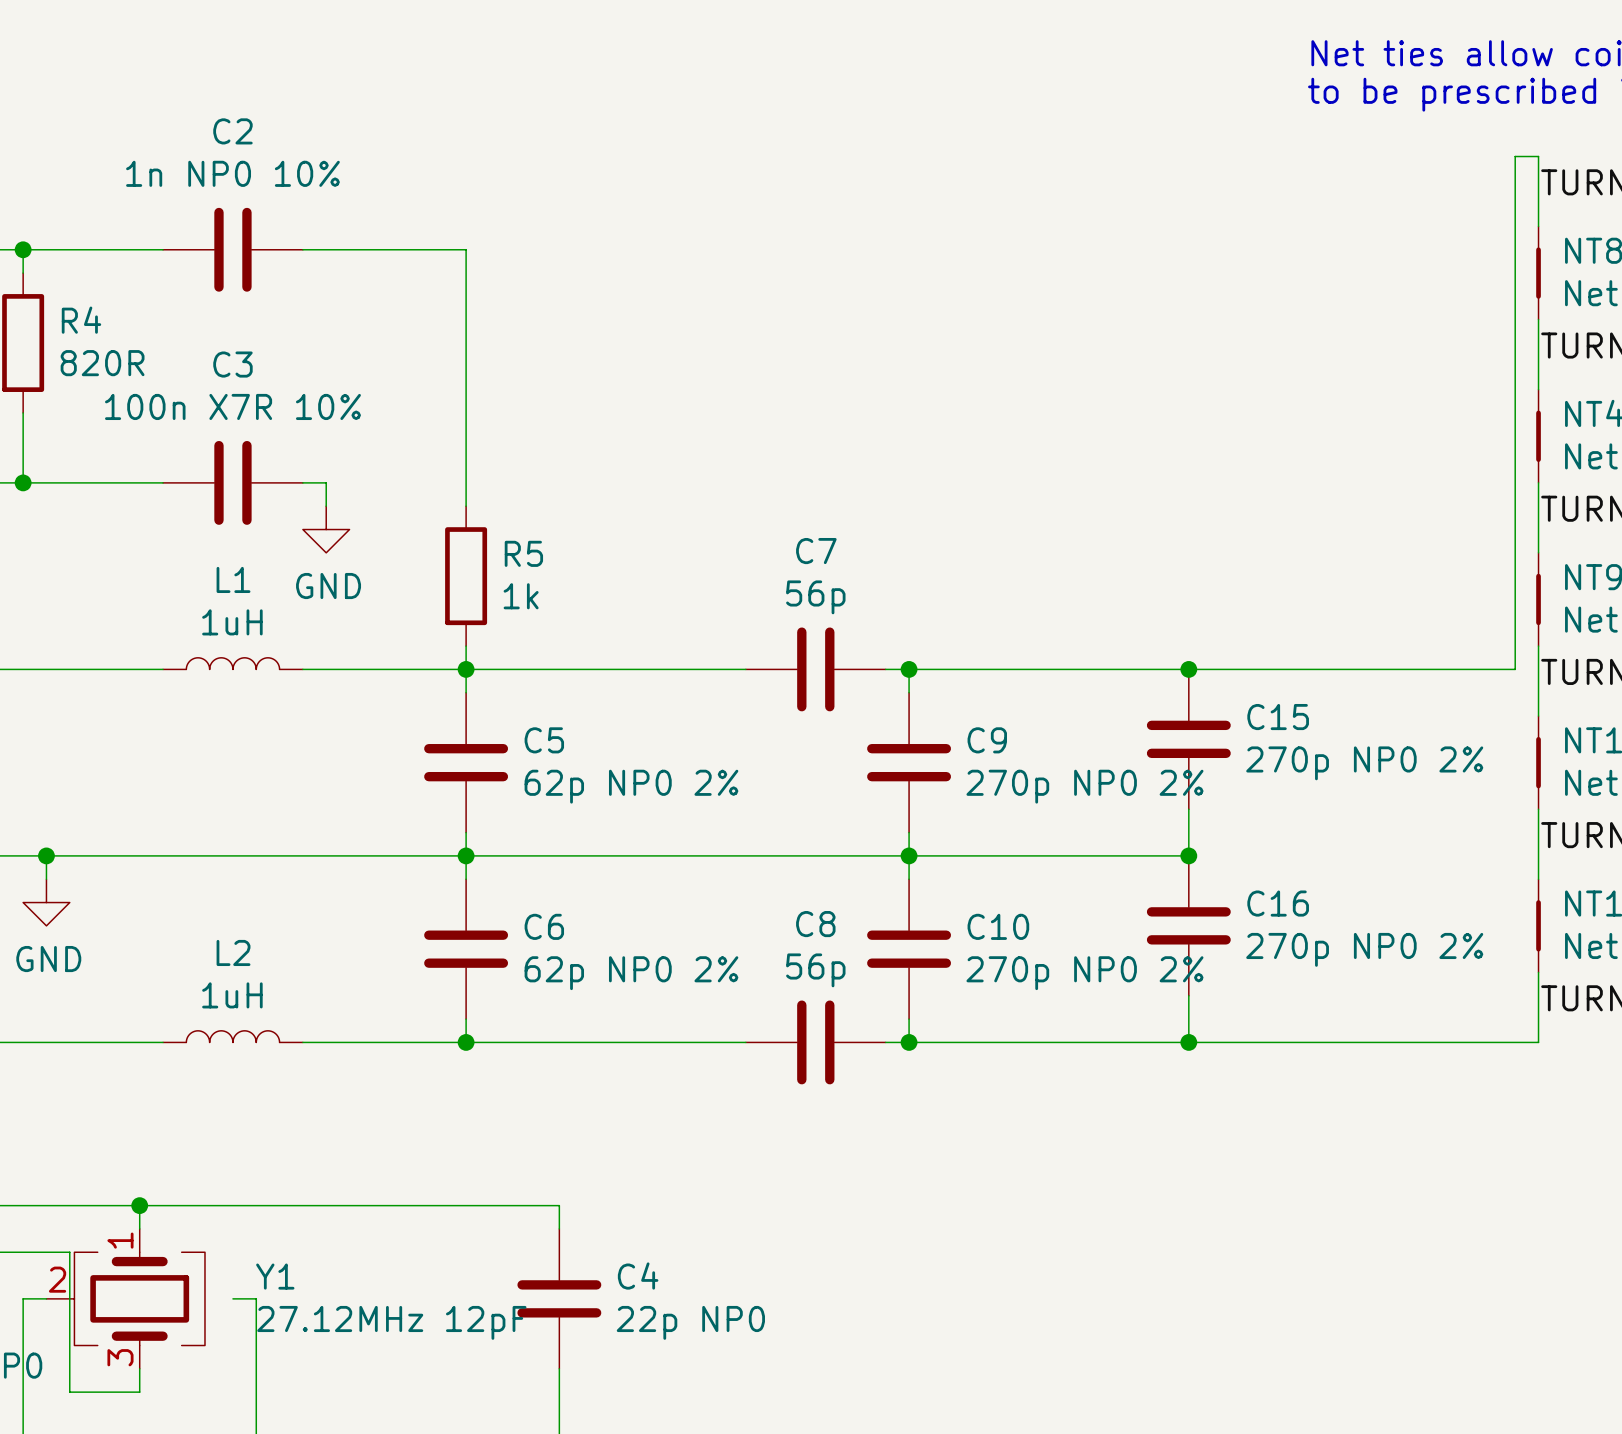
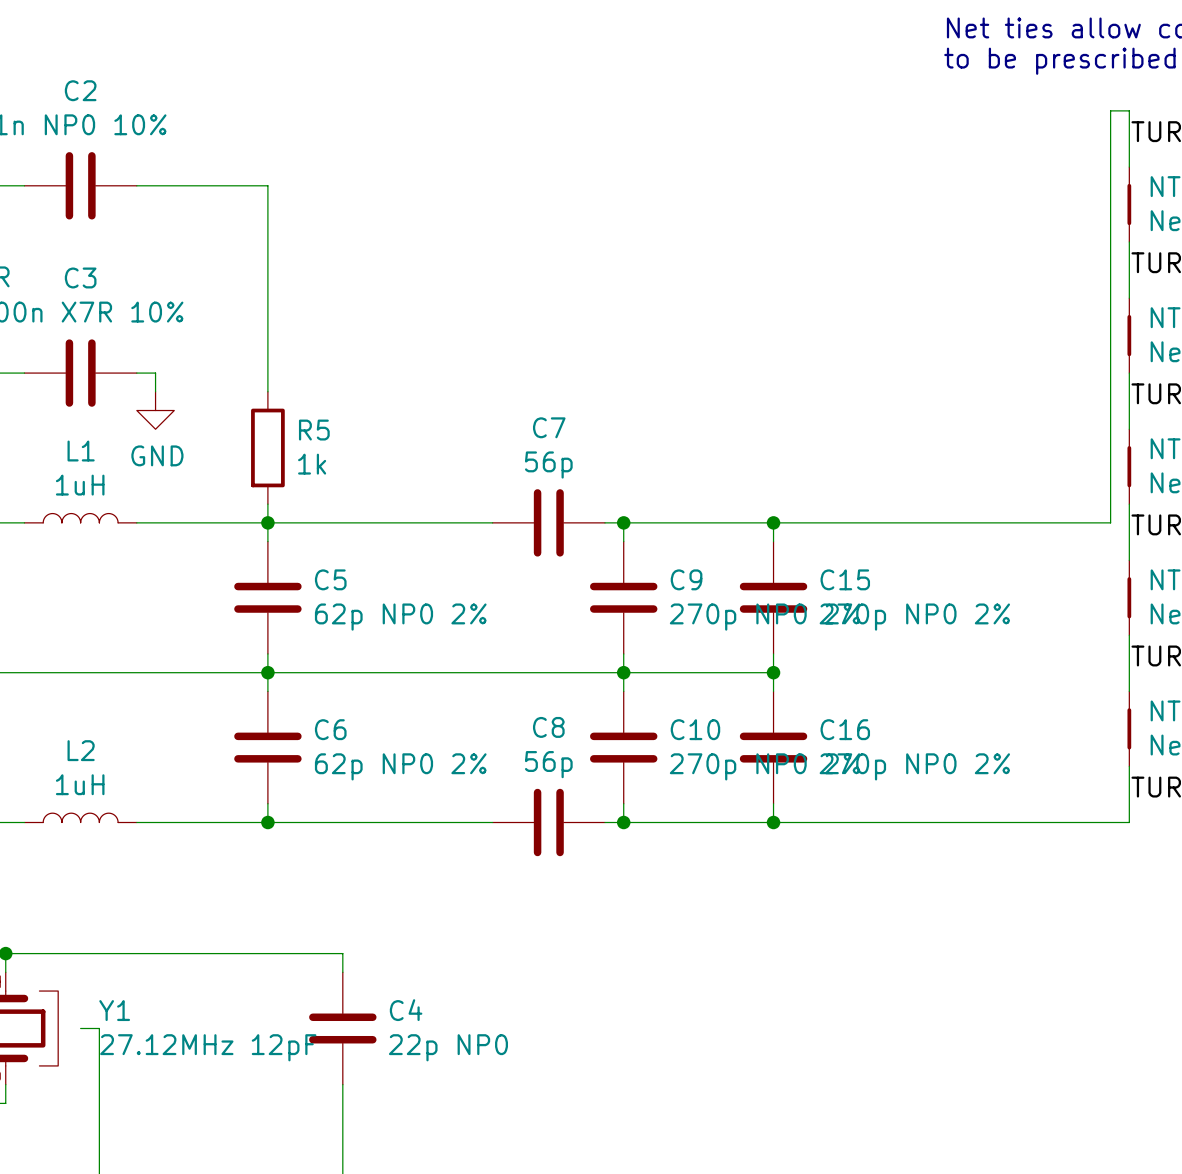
wire: none -> (773, 522) (773, 541)
junction position: (1188, 669) -> (773, 522)
C15 position: (1188, 739) -> (773, 597)
wire: (1188, 809) (1188, 855) (1095, 855) -> none
junction position: (1188, 855) -> (773, 672)
C16 position: (1188, 925) -> (773, 747)
wire: (1188, 995) (1188, 1042) -> (773, 653) (773, 691)
wire: none -> (773, 803) (773, 822)
junction position: (1188, 1042) -> (773, 822)

